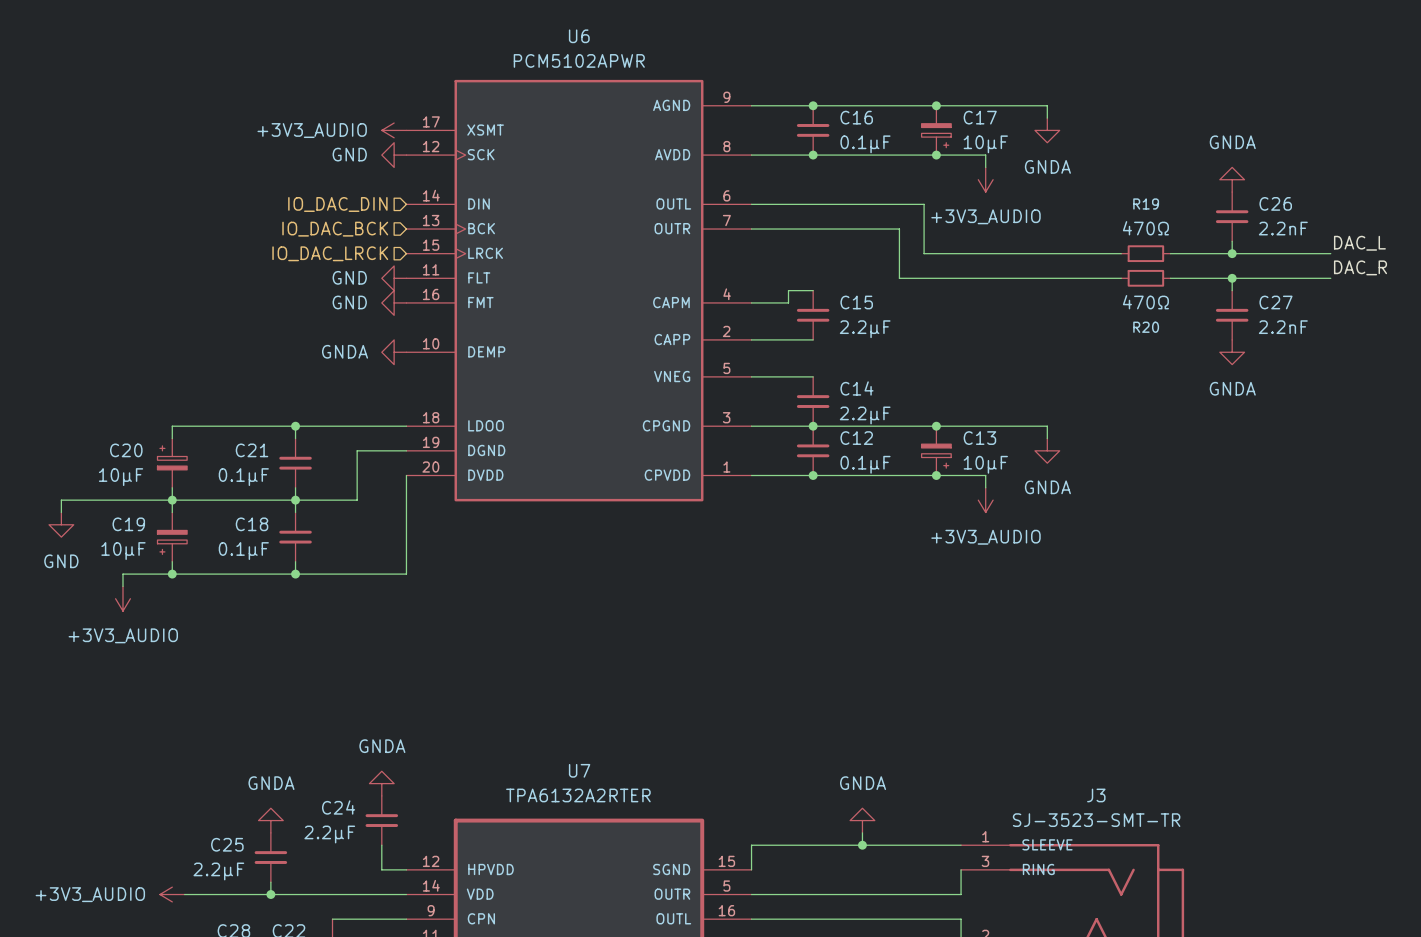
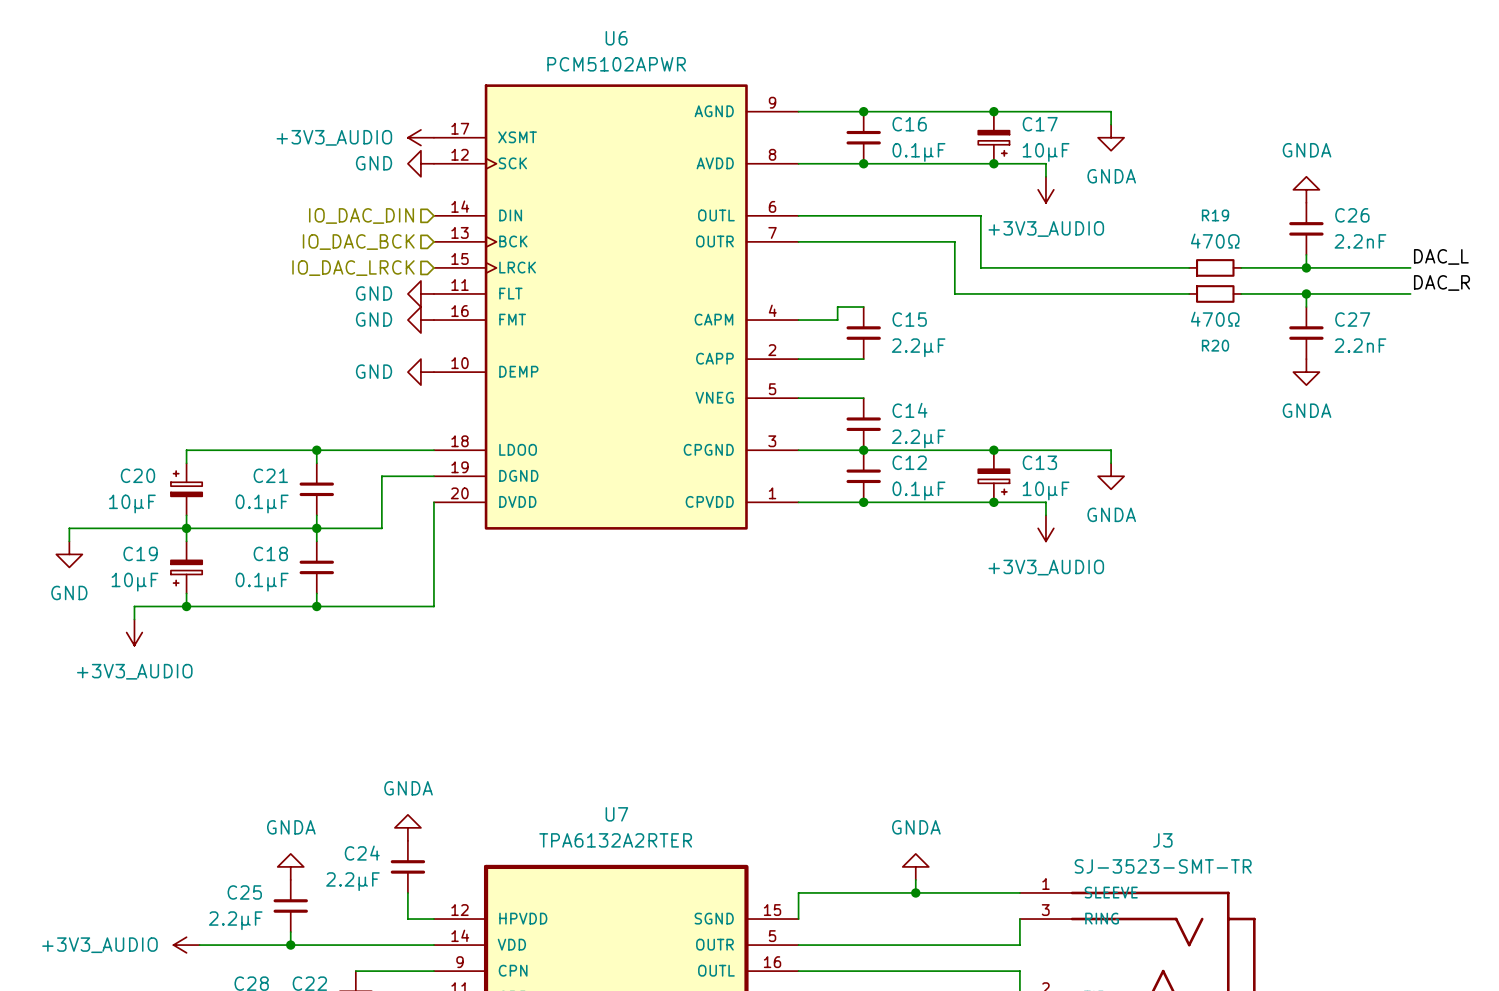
power symbol: GNDA (394, 352) -> GND (420, 372)

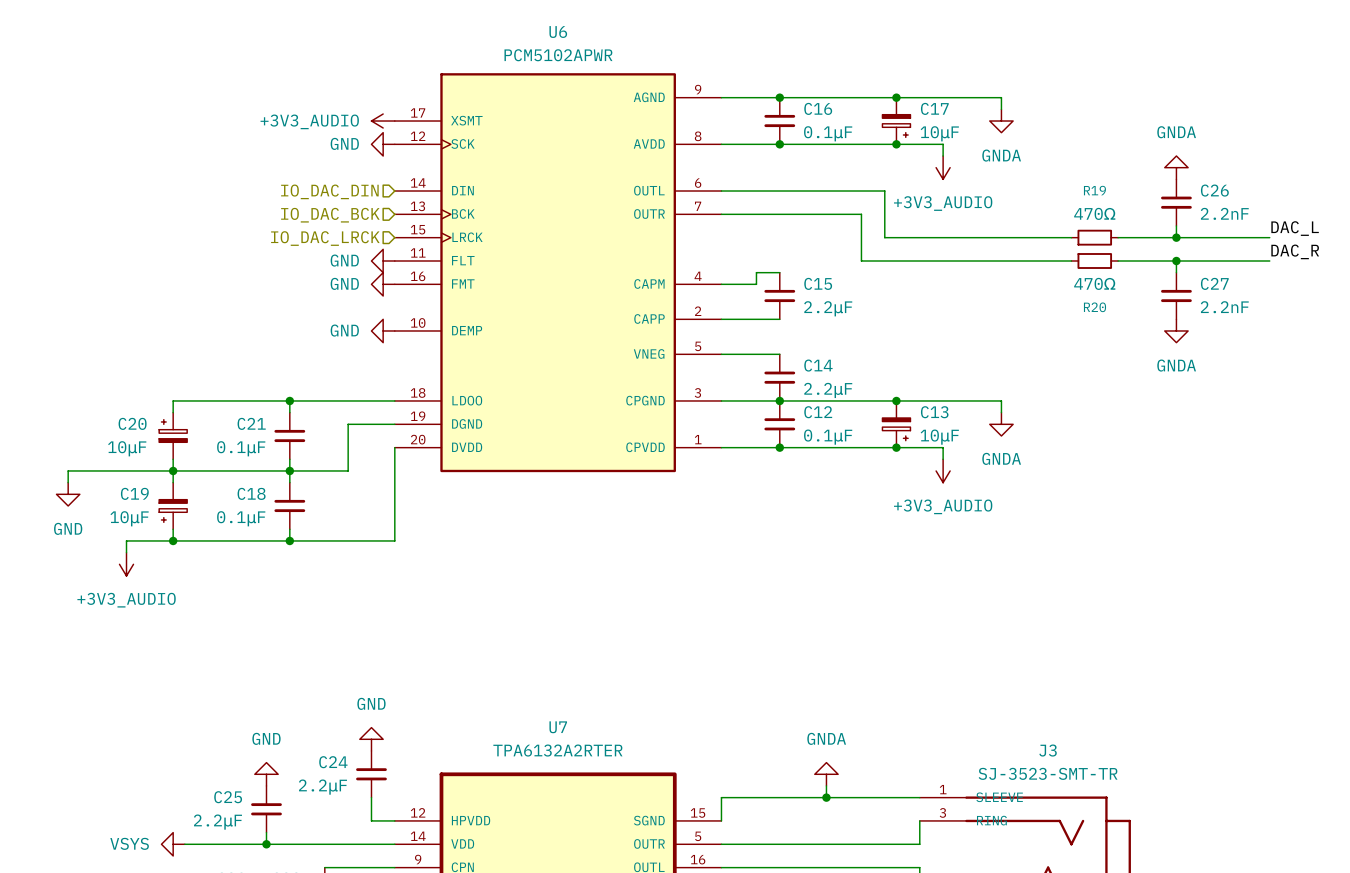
power symbol: GNDA (407, 827) -> GND (371, 739)
power symbol: GNDA (290, 866) -> GND (266, 774)
power symbol: +3V3_AUDIO (186, 945) -> VSYS (173, 844)

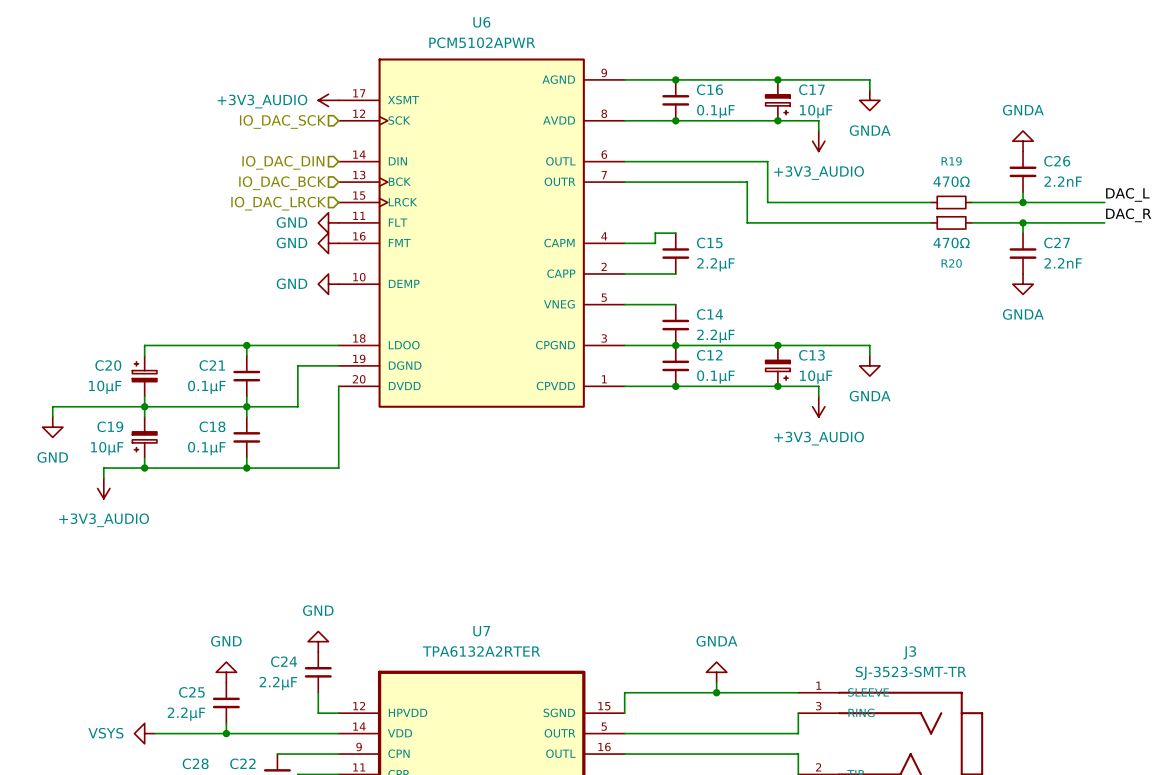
power symbol: GND (383, 144) -> none
hierarchical label: none -> IO_DAC_SCK (282, 121)

